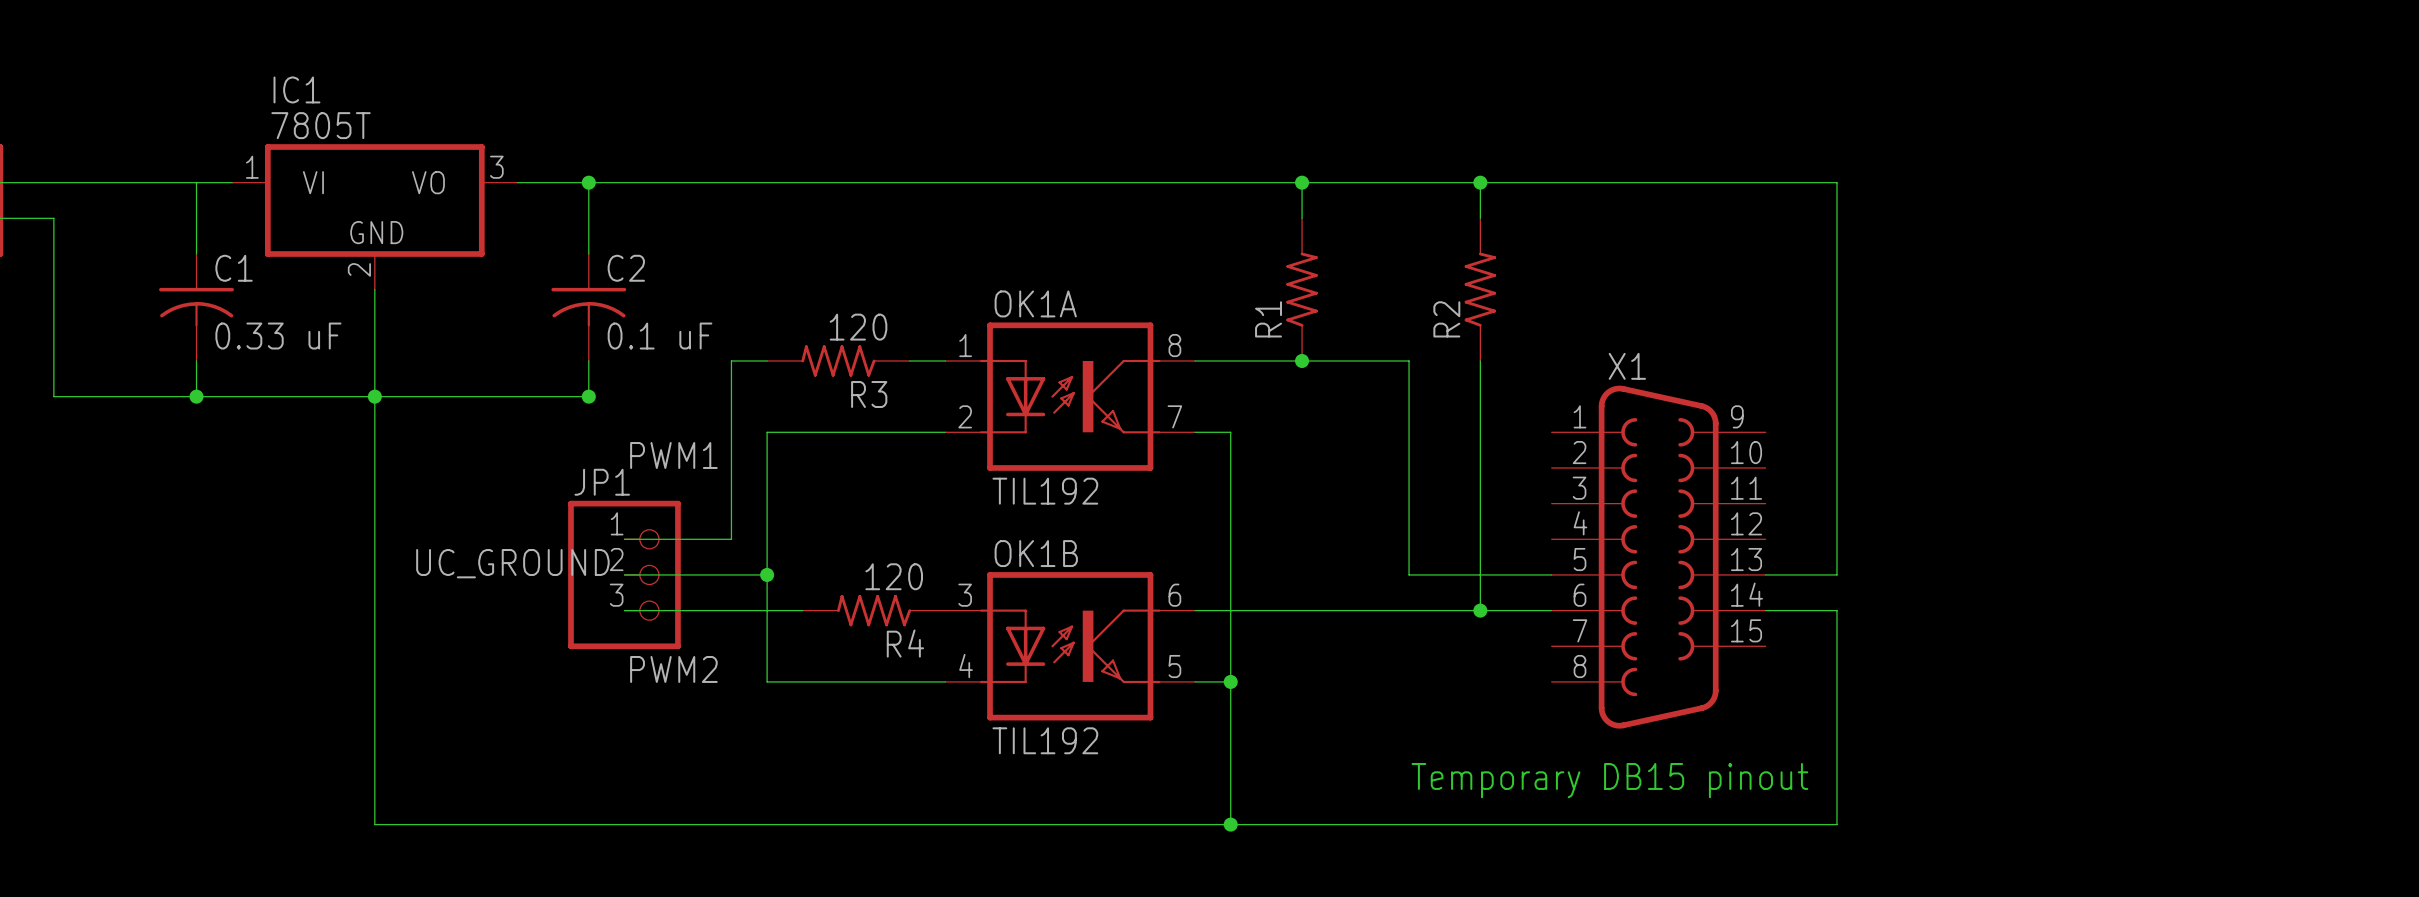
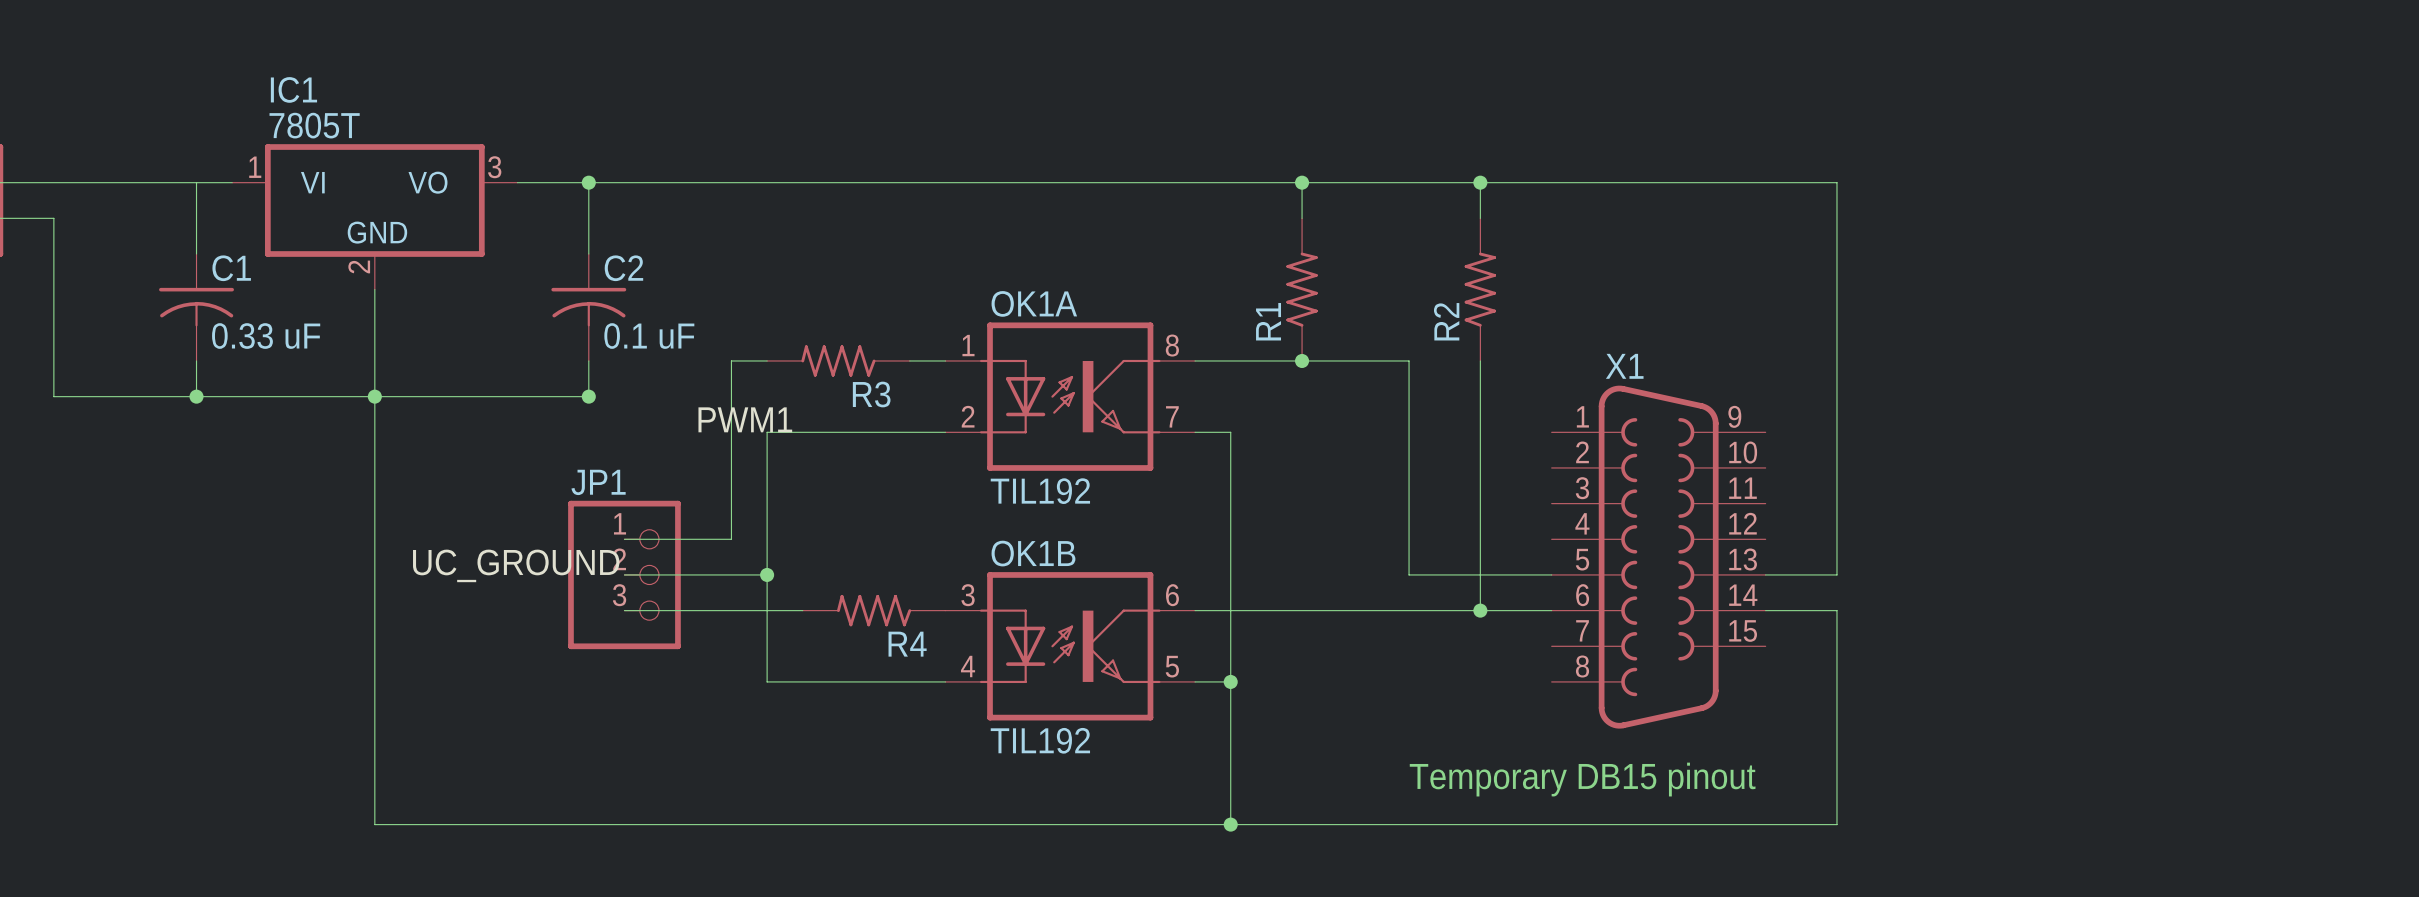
R3 value: 120 (858, 327) -> none
label position: PWM1 (673, 455) -> PWM1 (745, 419)
R4 value: 120 (894, 576) -> none
label: PWM2 (673, 669) -> none

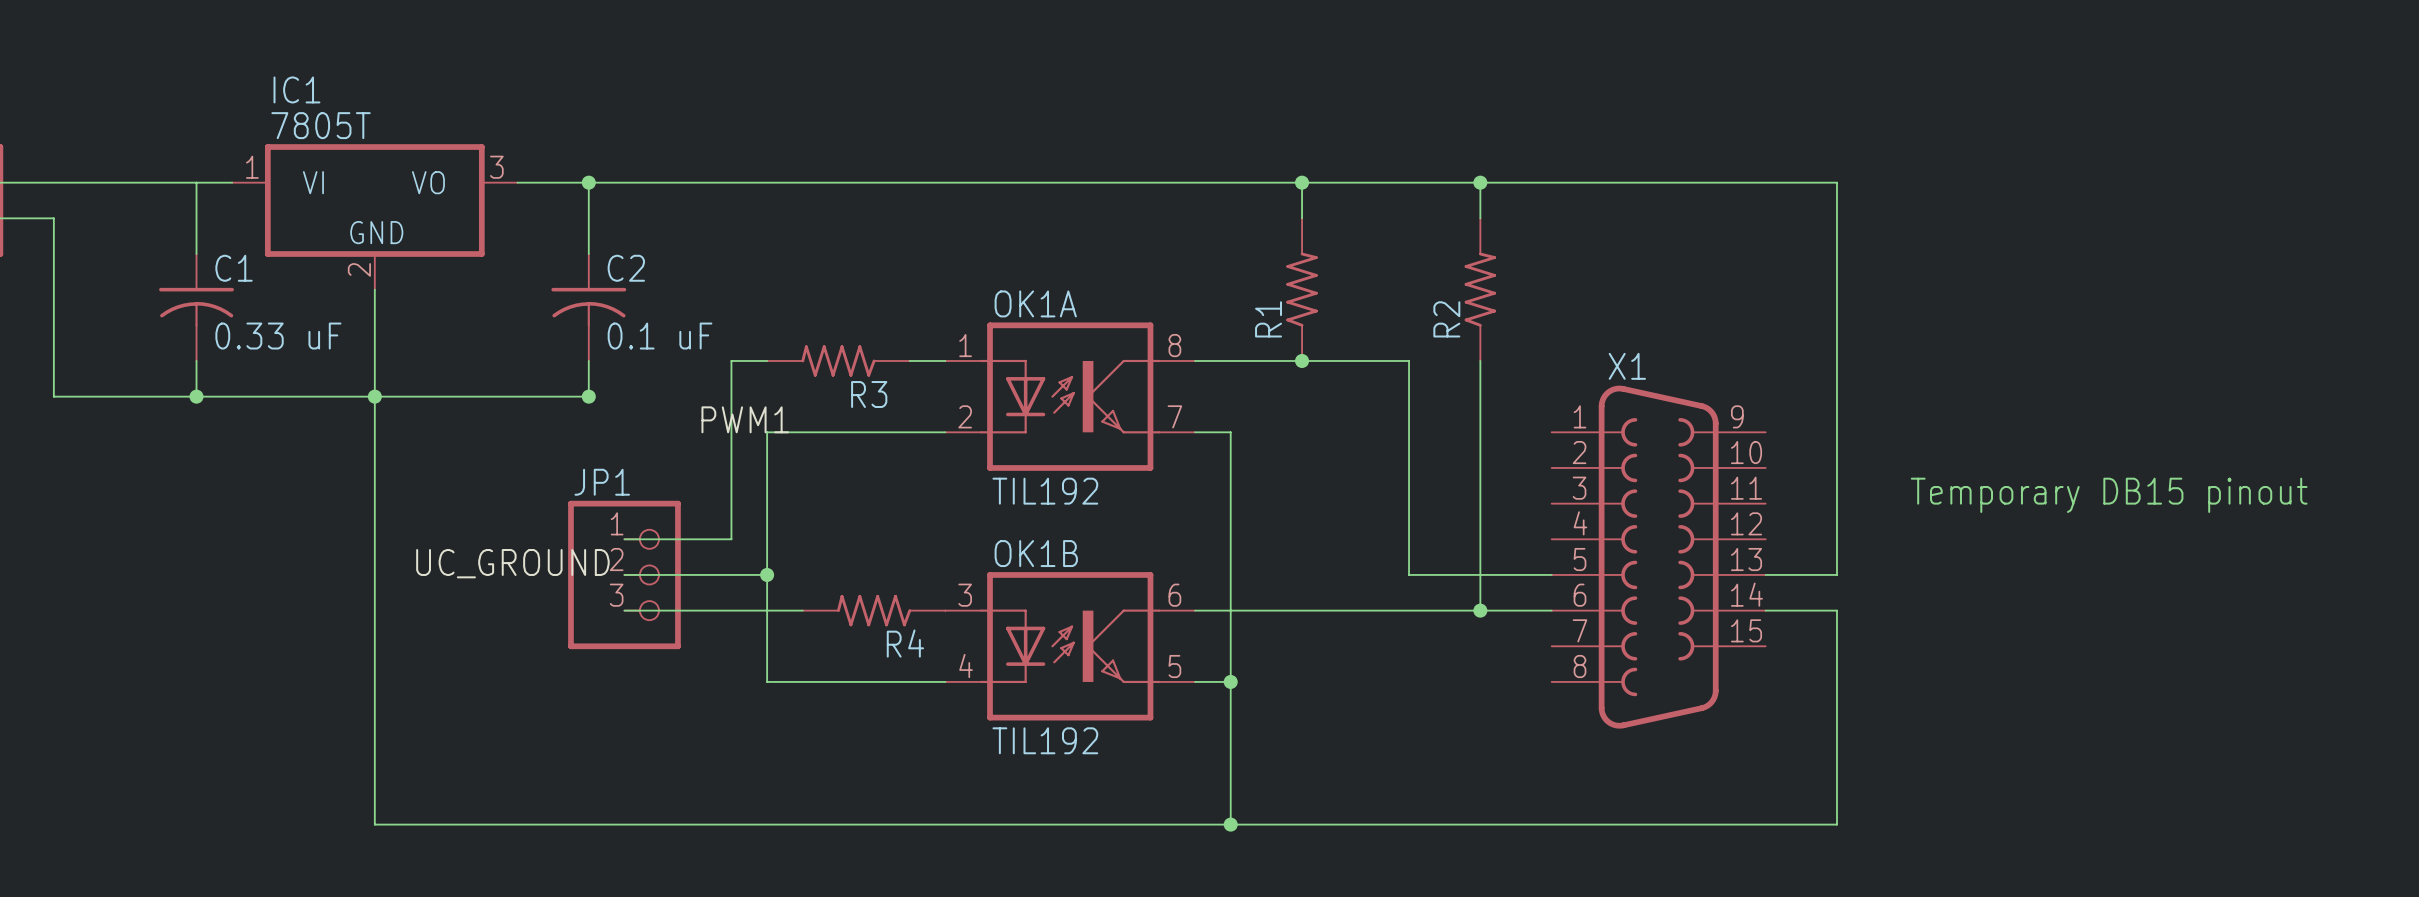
text: none -> Temporary DB15 pinout (2109, 495)
text: Temporary DB15 pinout (1582, 779) -> none

